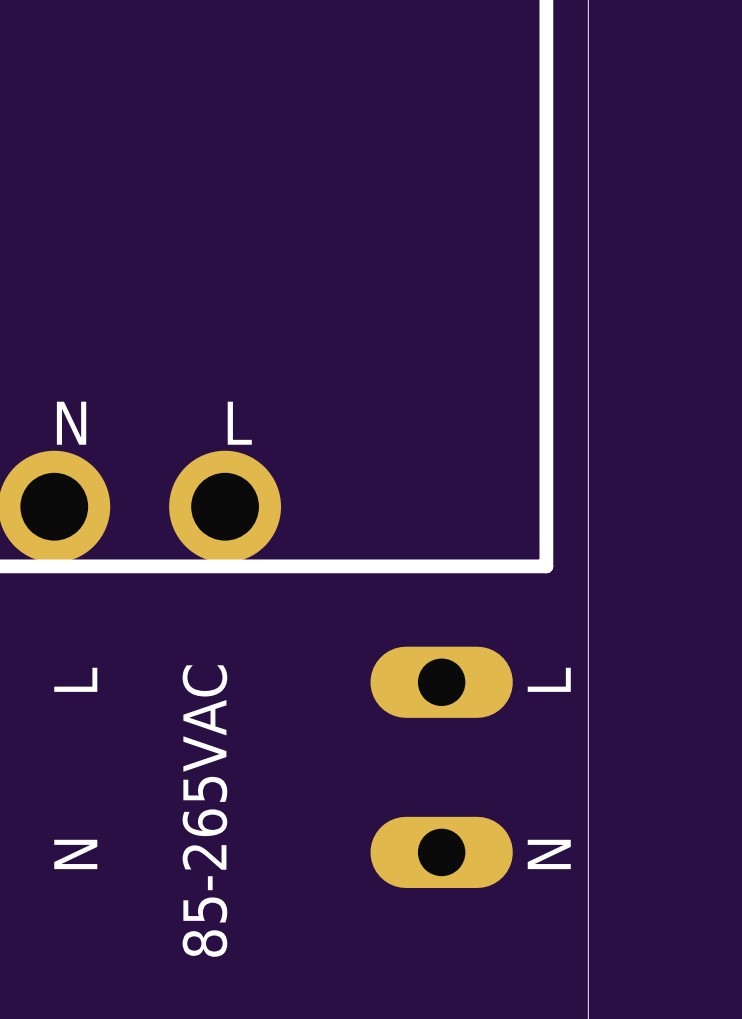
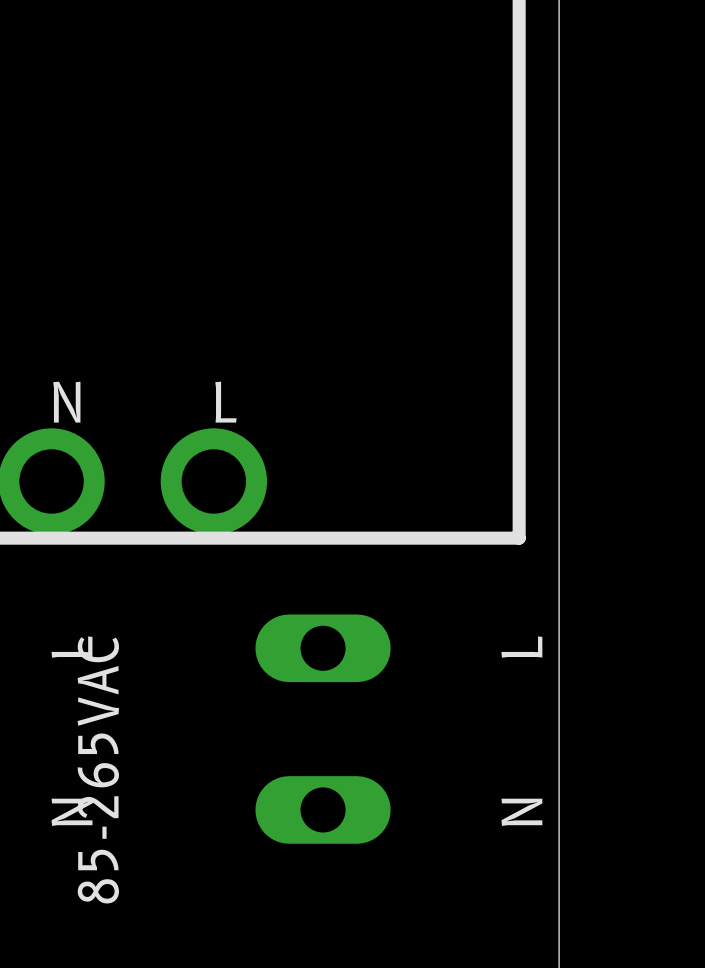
85-265VAC position: (441, 767) -> (323, 729)

